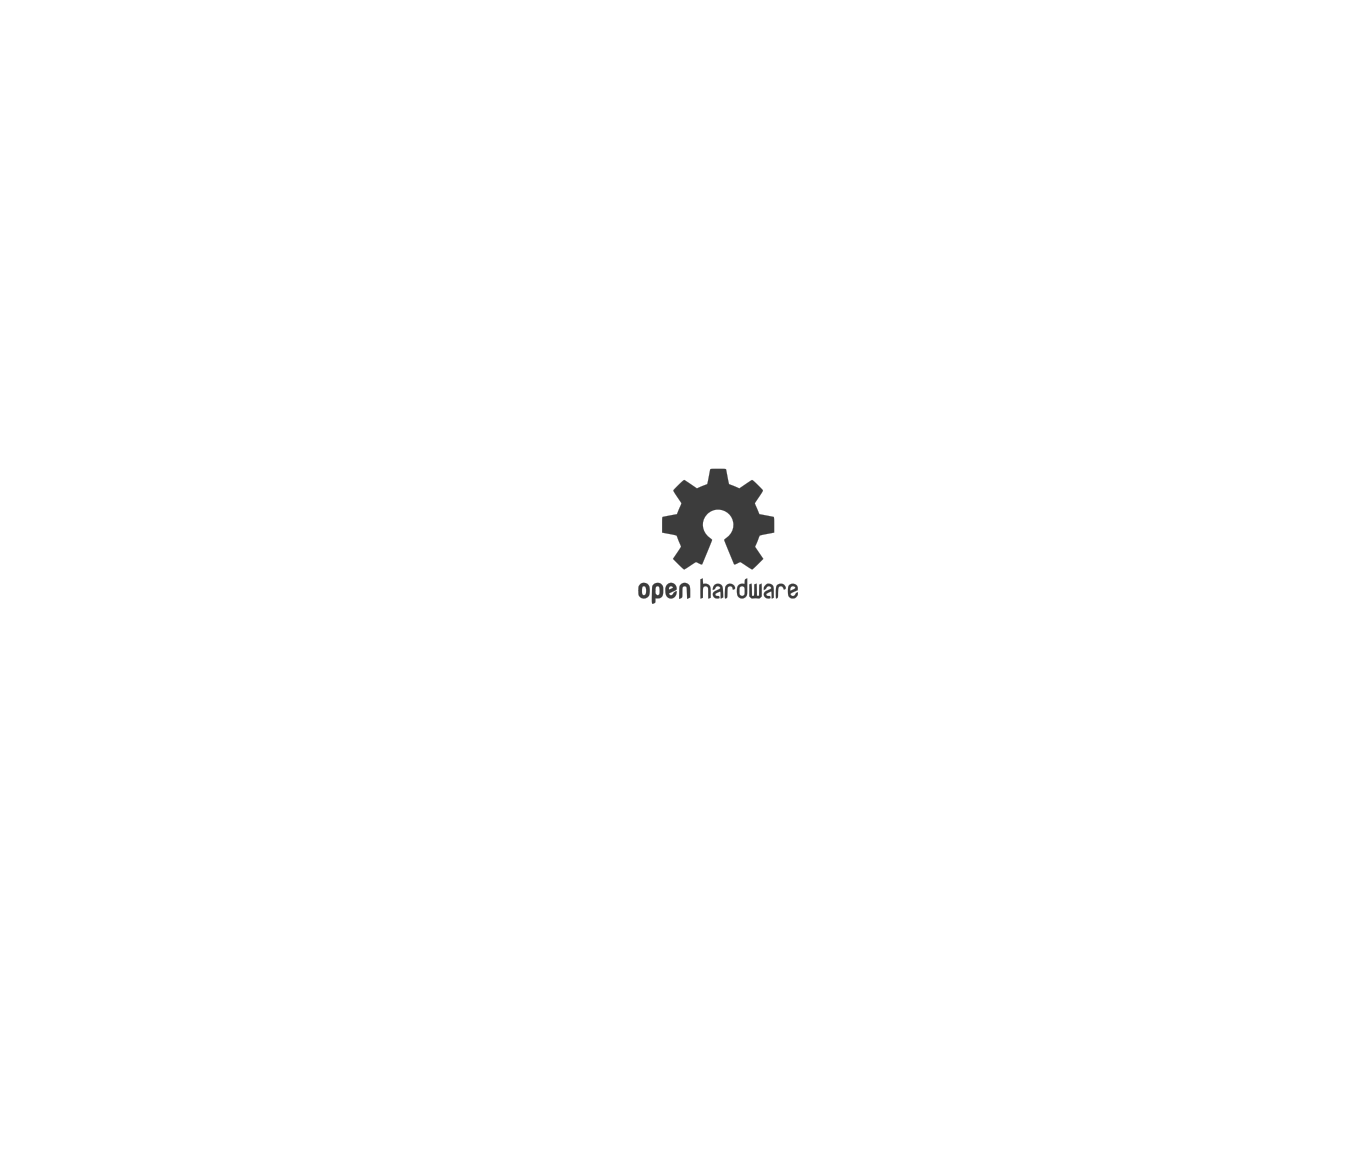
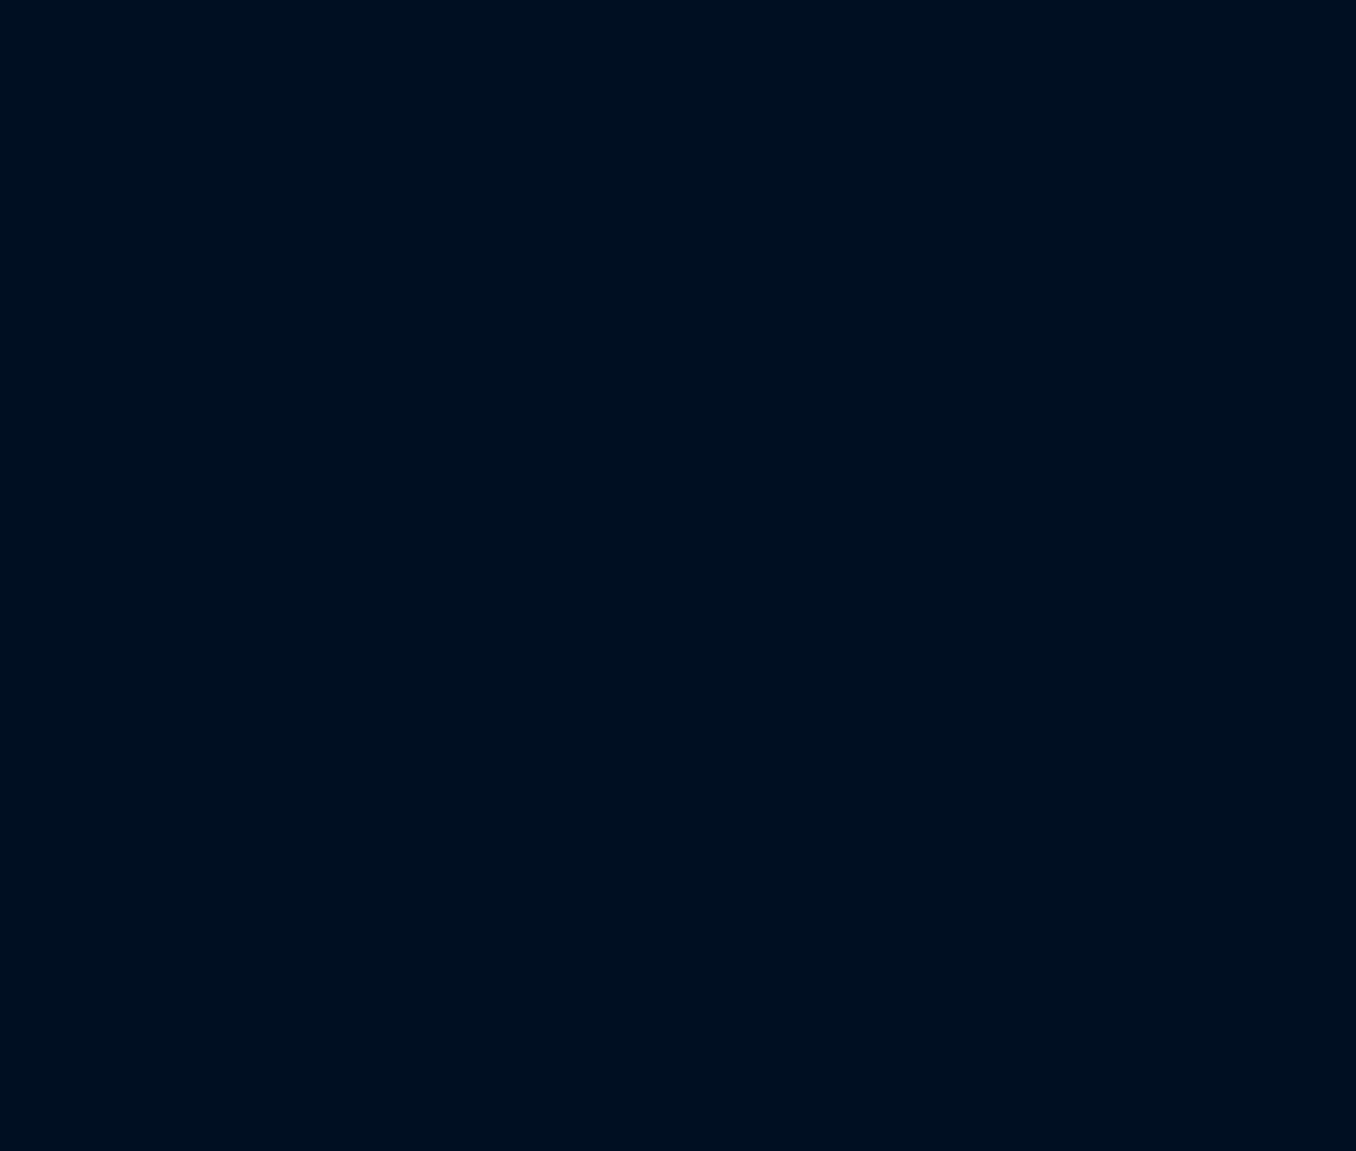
drawing: [638, 468, 798, 604] -> none

